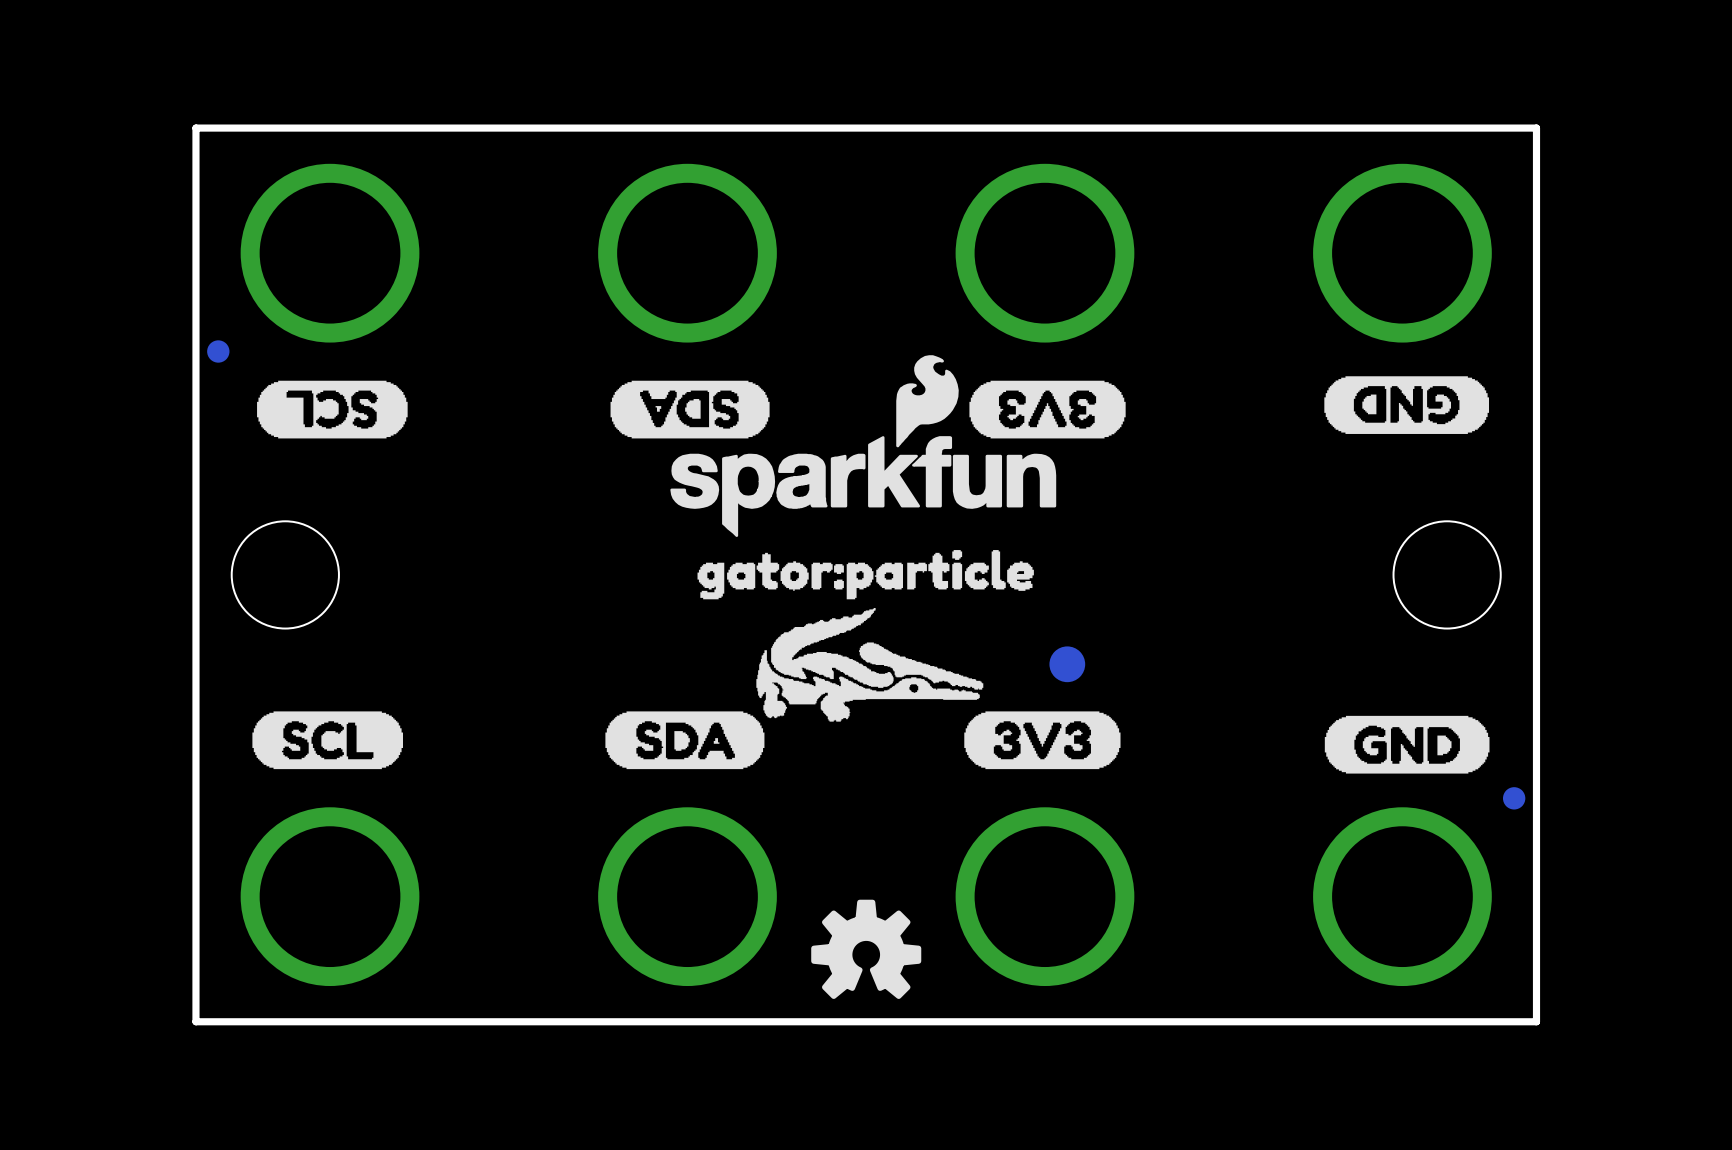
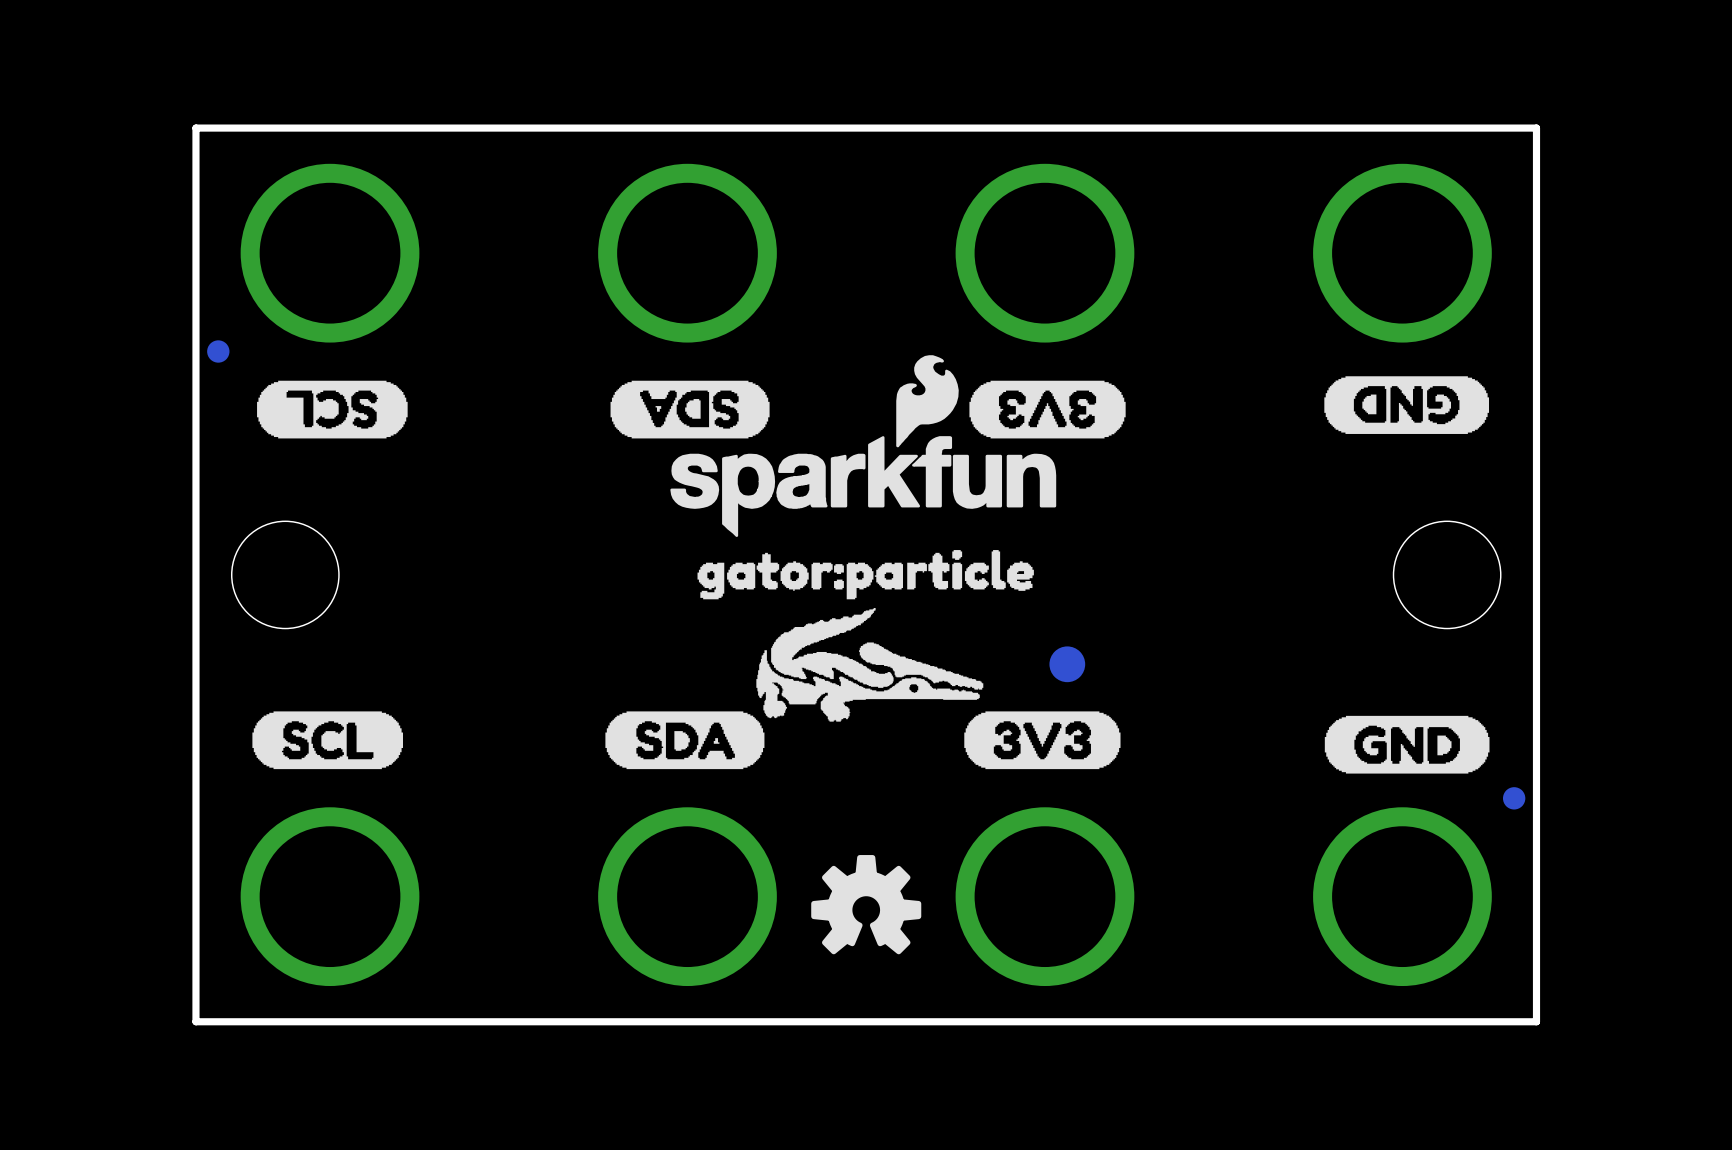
drawing position: (866, 949) -> (866, 904)

